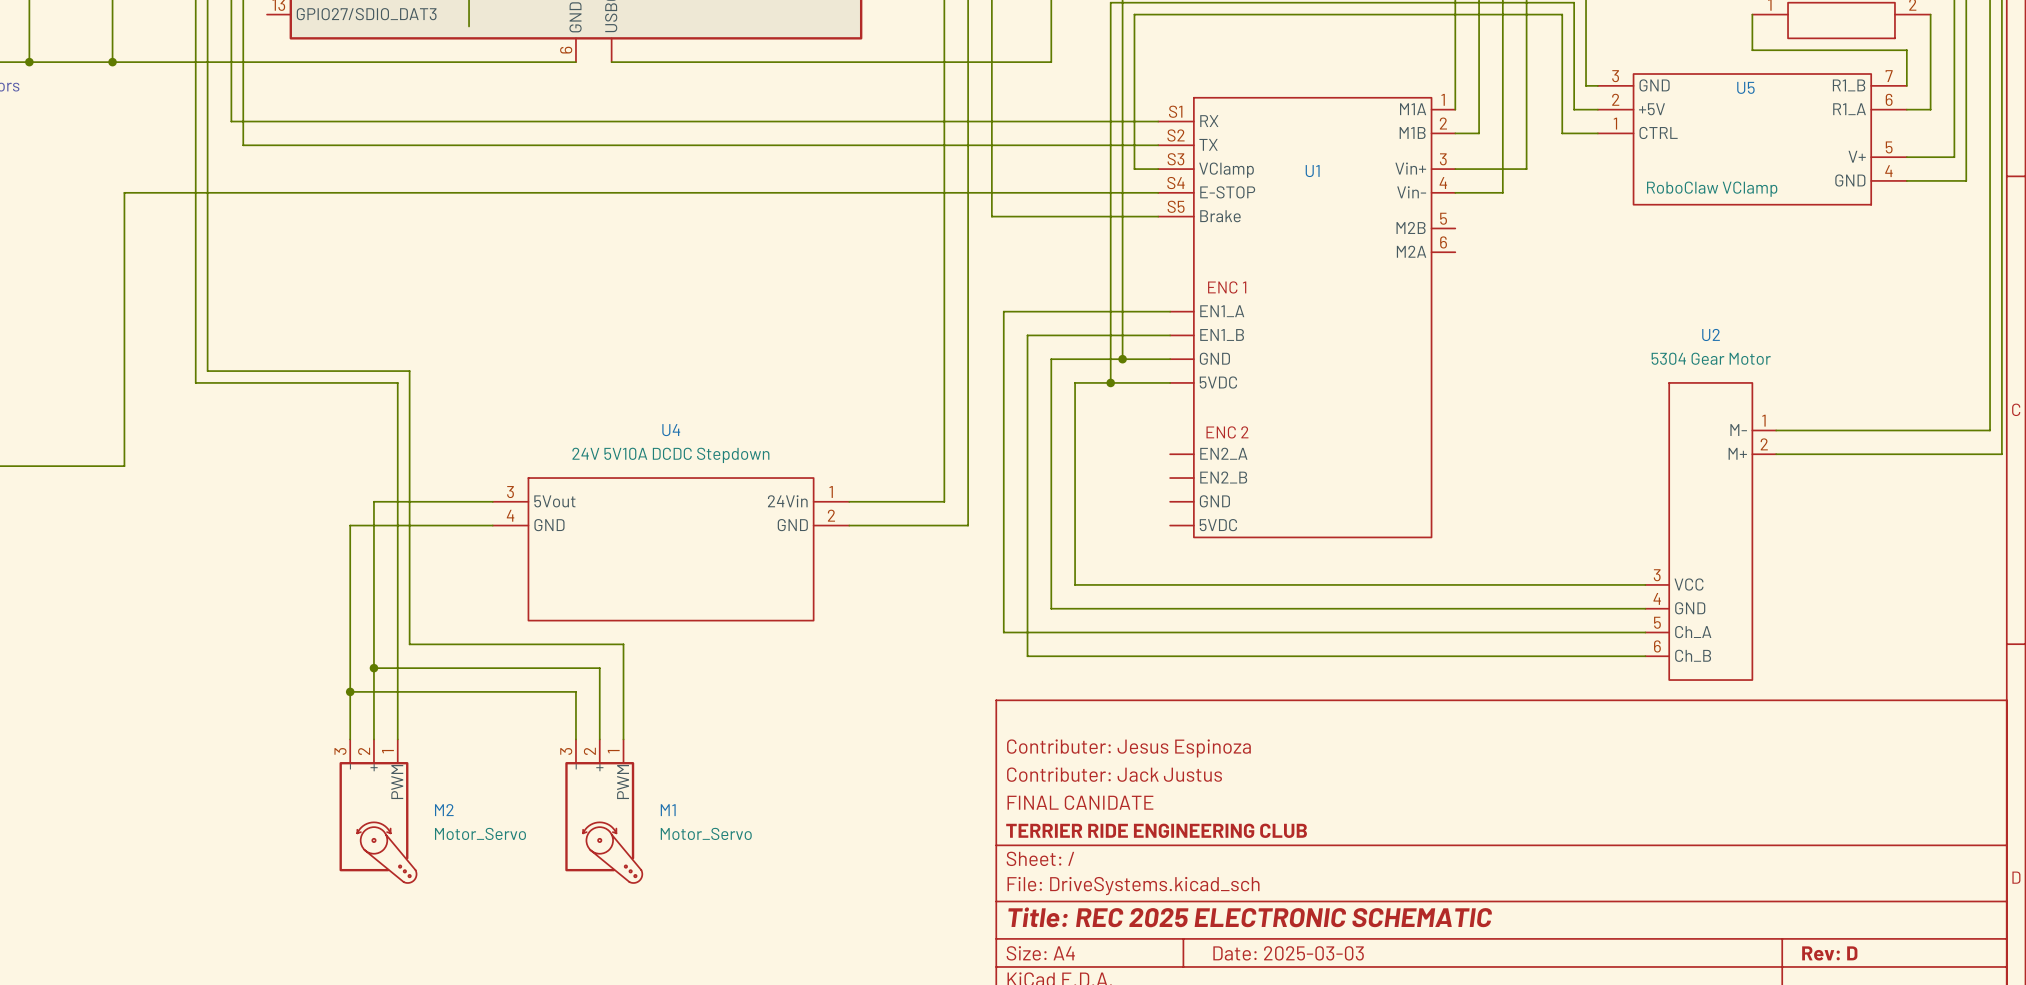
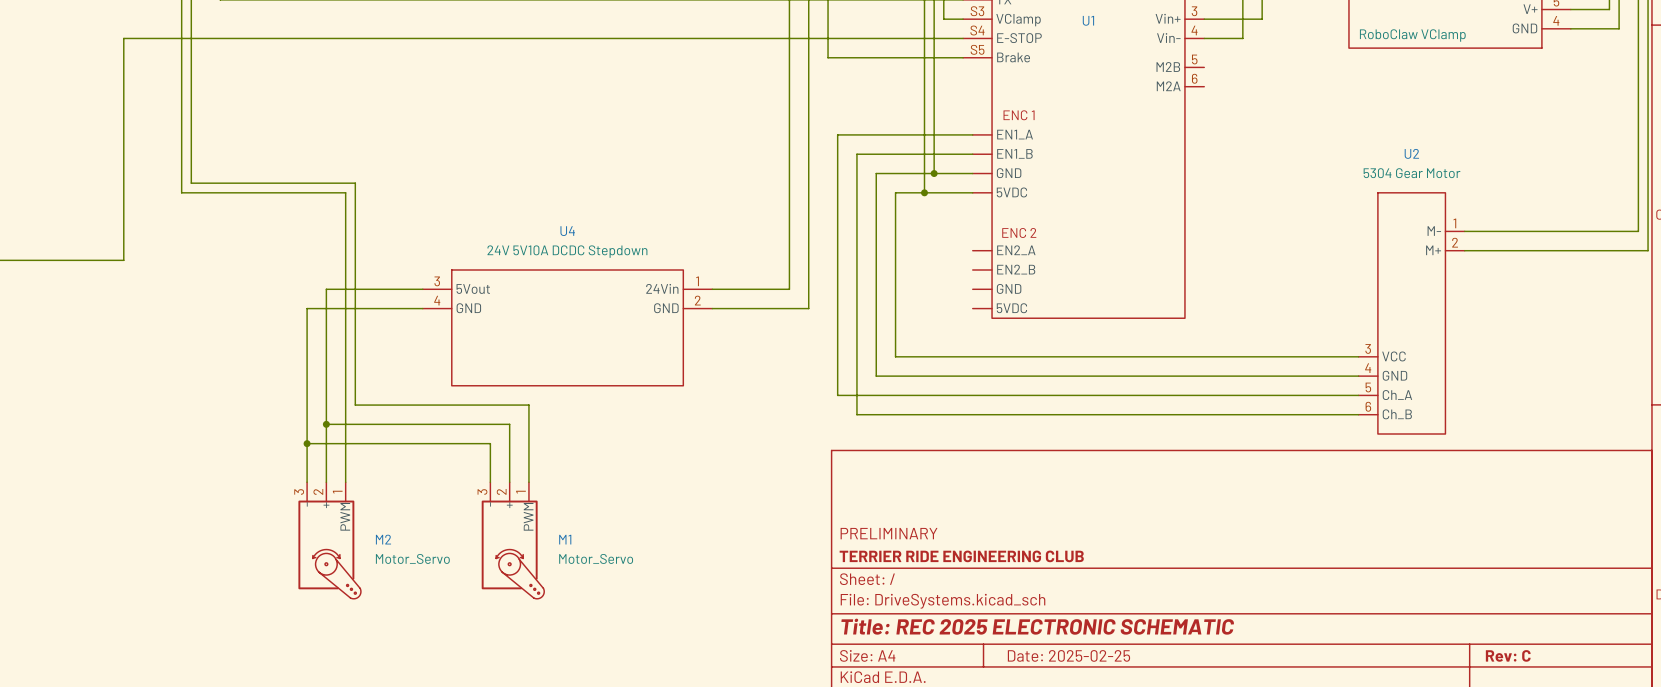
title block: Contributer: Jesus Espinoza (1128, 748) -> none
title block: Contributer: Jack Justus (1114, 774) -> none
title block: FINAL CANIDATE (1080, 802) -> PRELIMINARY (889, 533)
title block: Date: 2025-03-03 (1288, 953) -> Date: 2025-02-25 (1068, 655)
title block: Rev: D (1829, 953) -> Rev: C (1508, 655)

